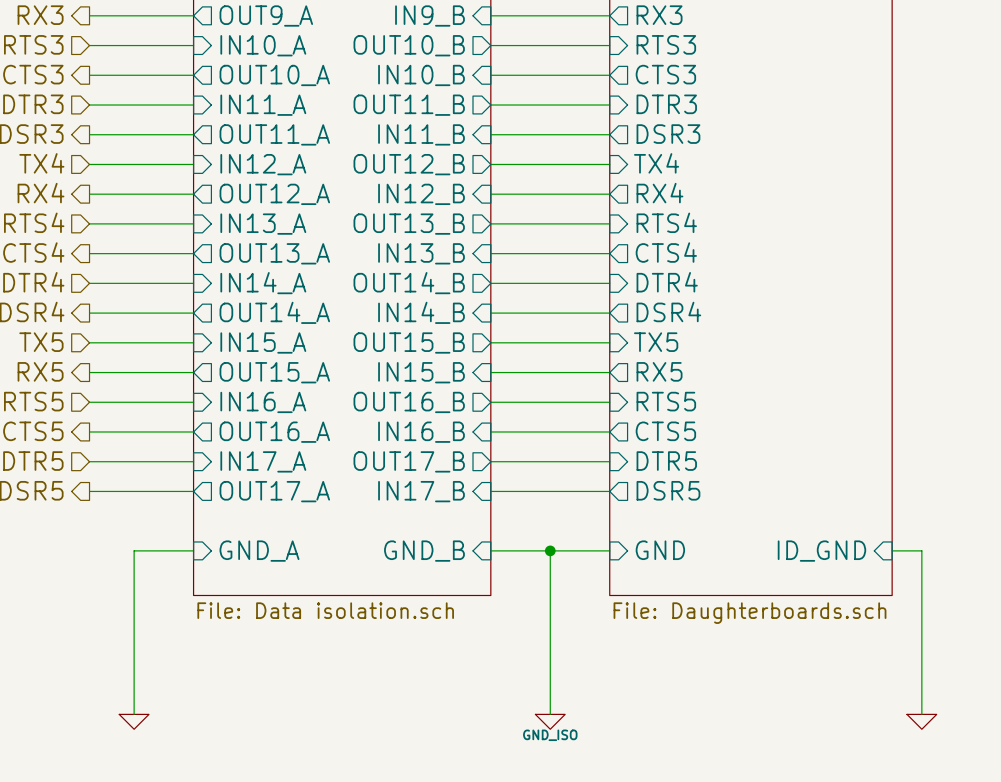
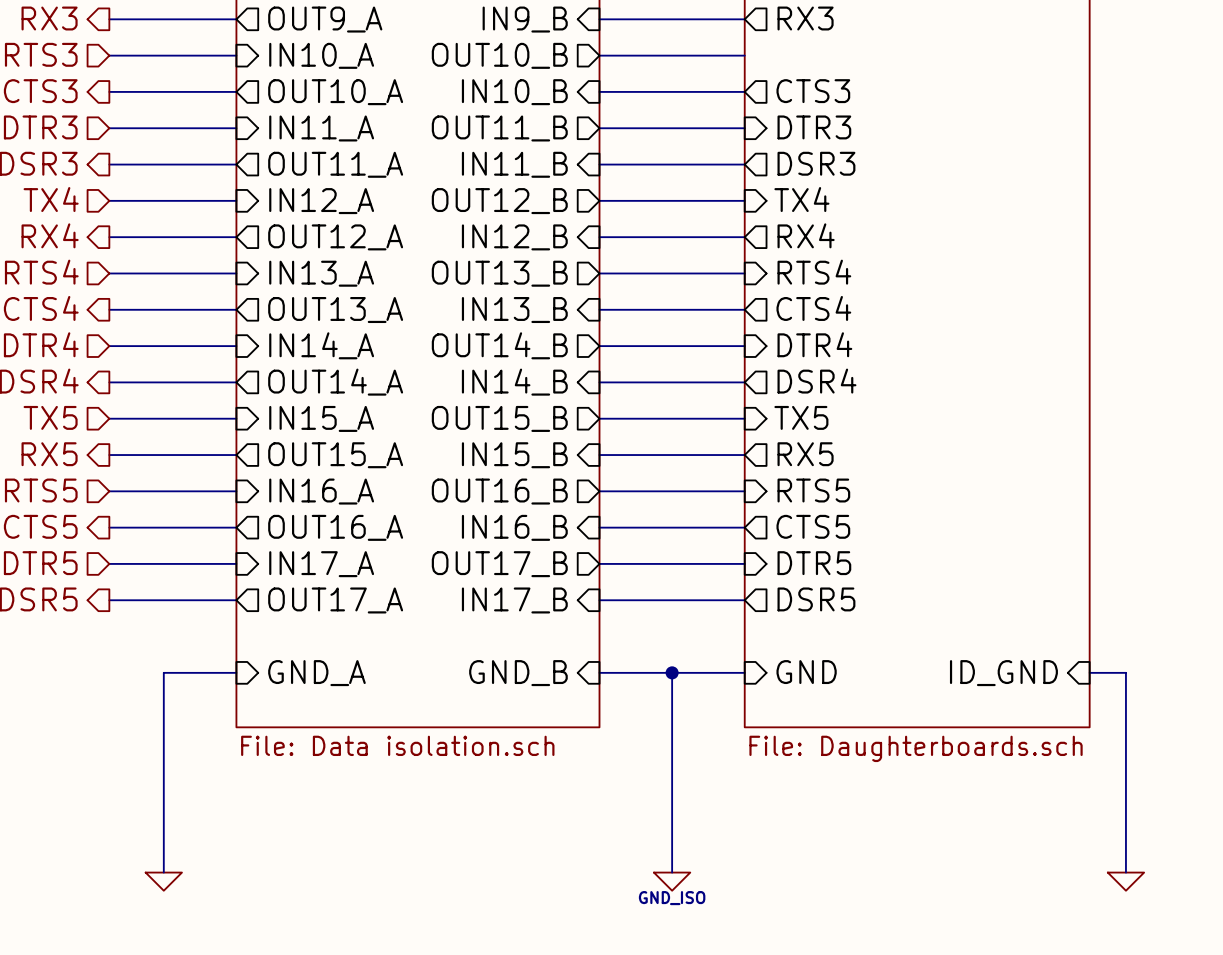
sheet pin: RTS3 (666, 44) -> none

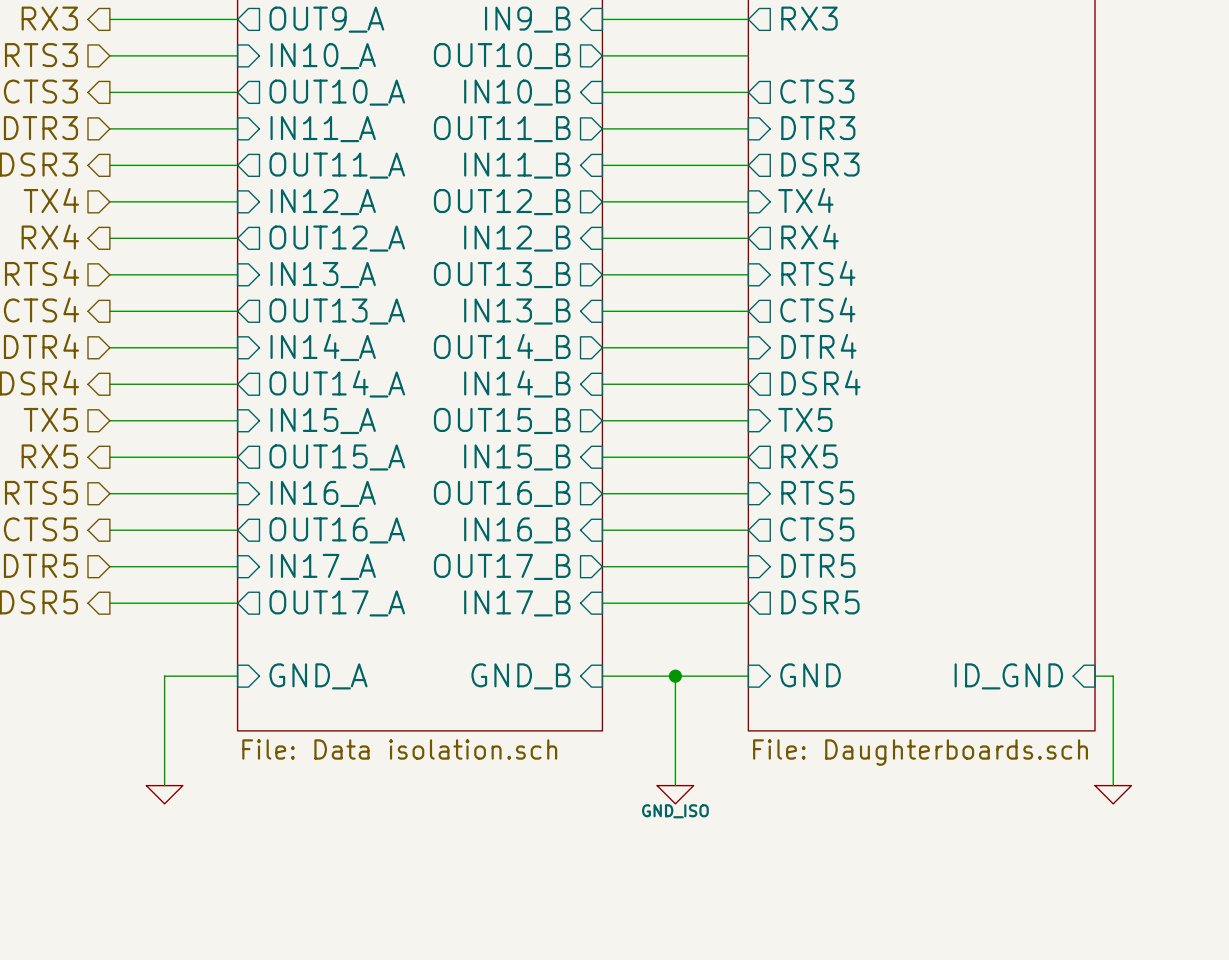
wire: (1107, 672) (1125, 672) (1125, 872) -> (1113, 676) (1113, 785)
wire: (163, 781) (163, 872) -> none
wire: (672, 781) (672, 872) -> none
power symbol position: (163, 881) -> (164, 794)
power symbol position: GND_ISO (672, 881) -> GND_ISO (675, 794)
power symbol position: (1125, 881) -> (1113, 794)

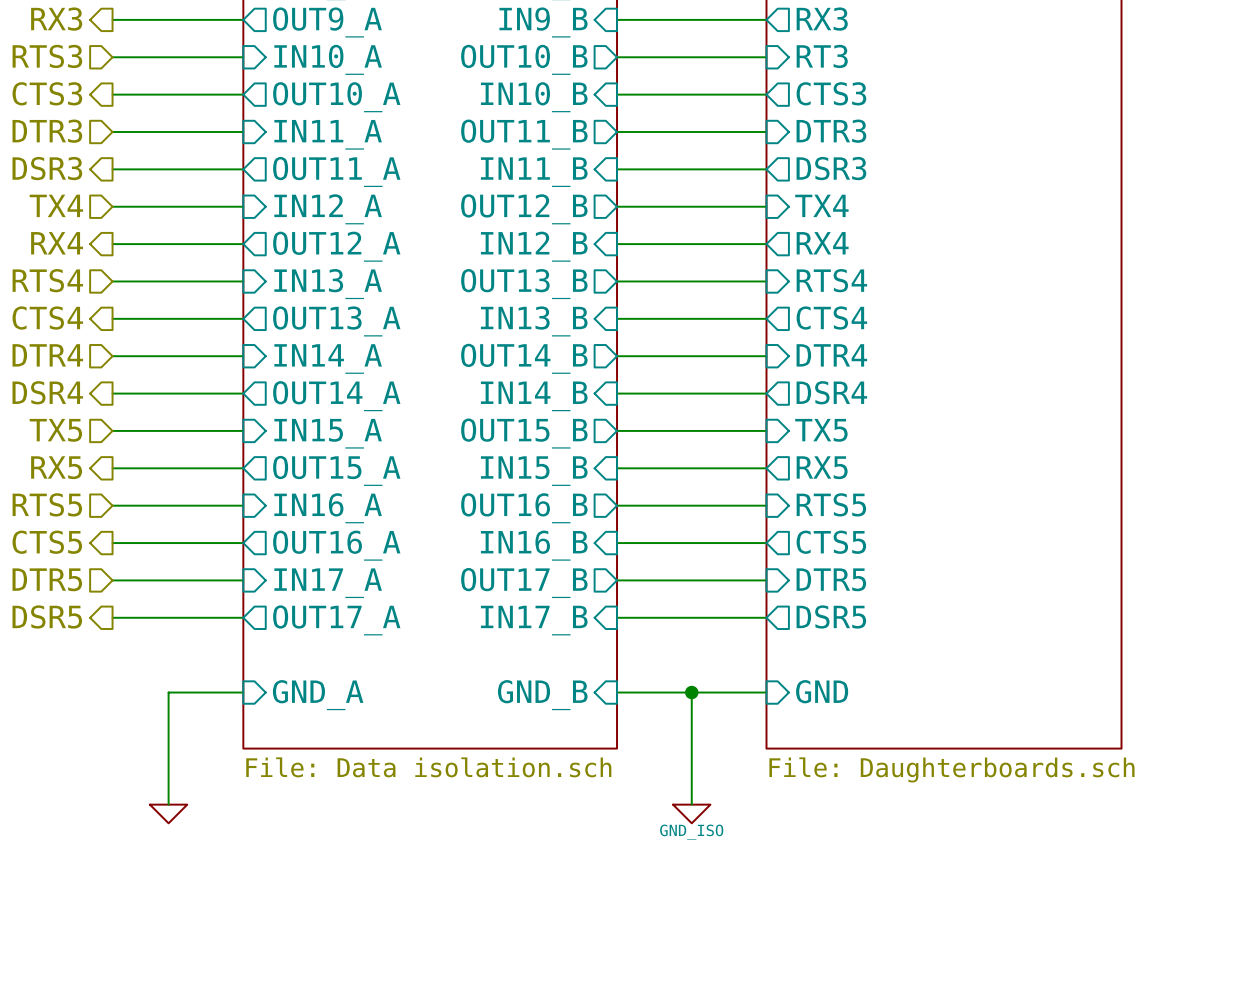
sheet pin: none -> RT3 (822, 56)
sheet pin: ID_GND (1008, 676) -> none
wire: (1094, 676) (1113, 676) (1113, 785) -> none
power symbol: (1113, 794) -> none

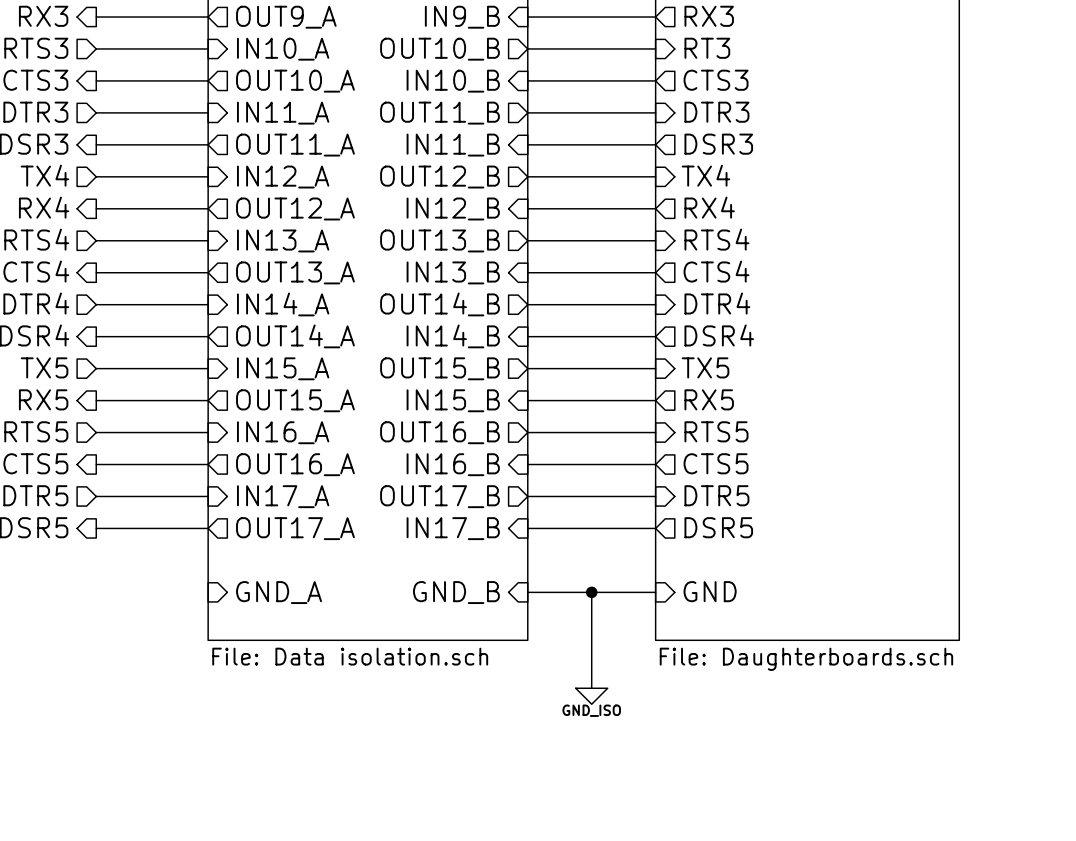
wire: (243, 692) (168, 692) (168, 804) -> none
power symbol: (168, 813) -> none

